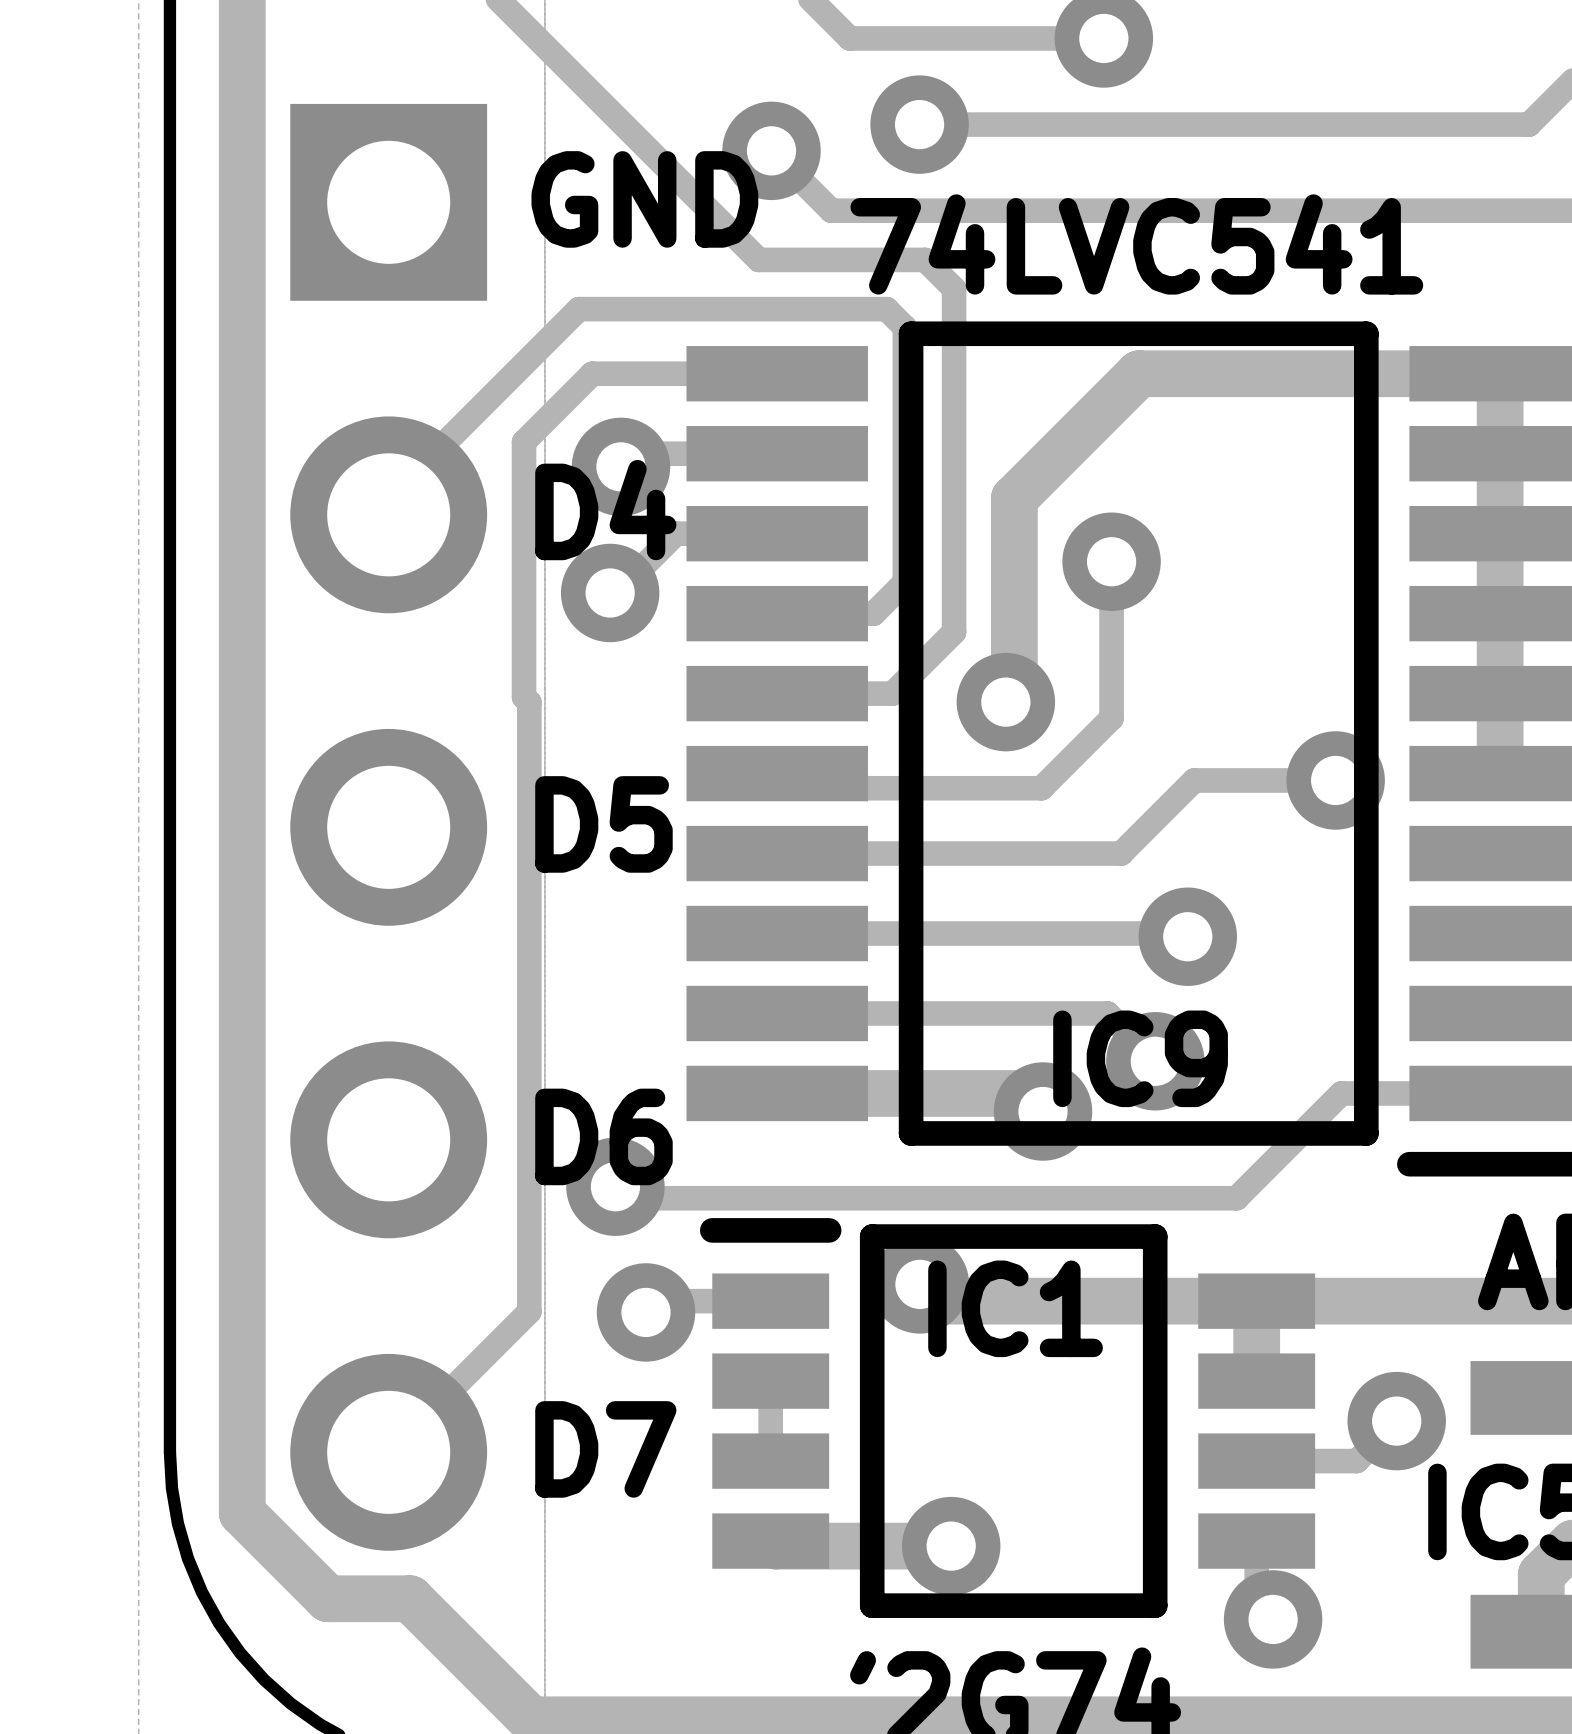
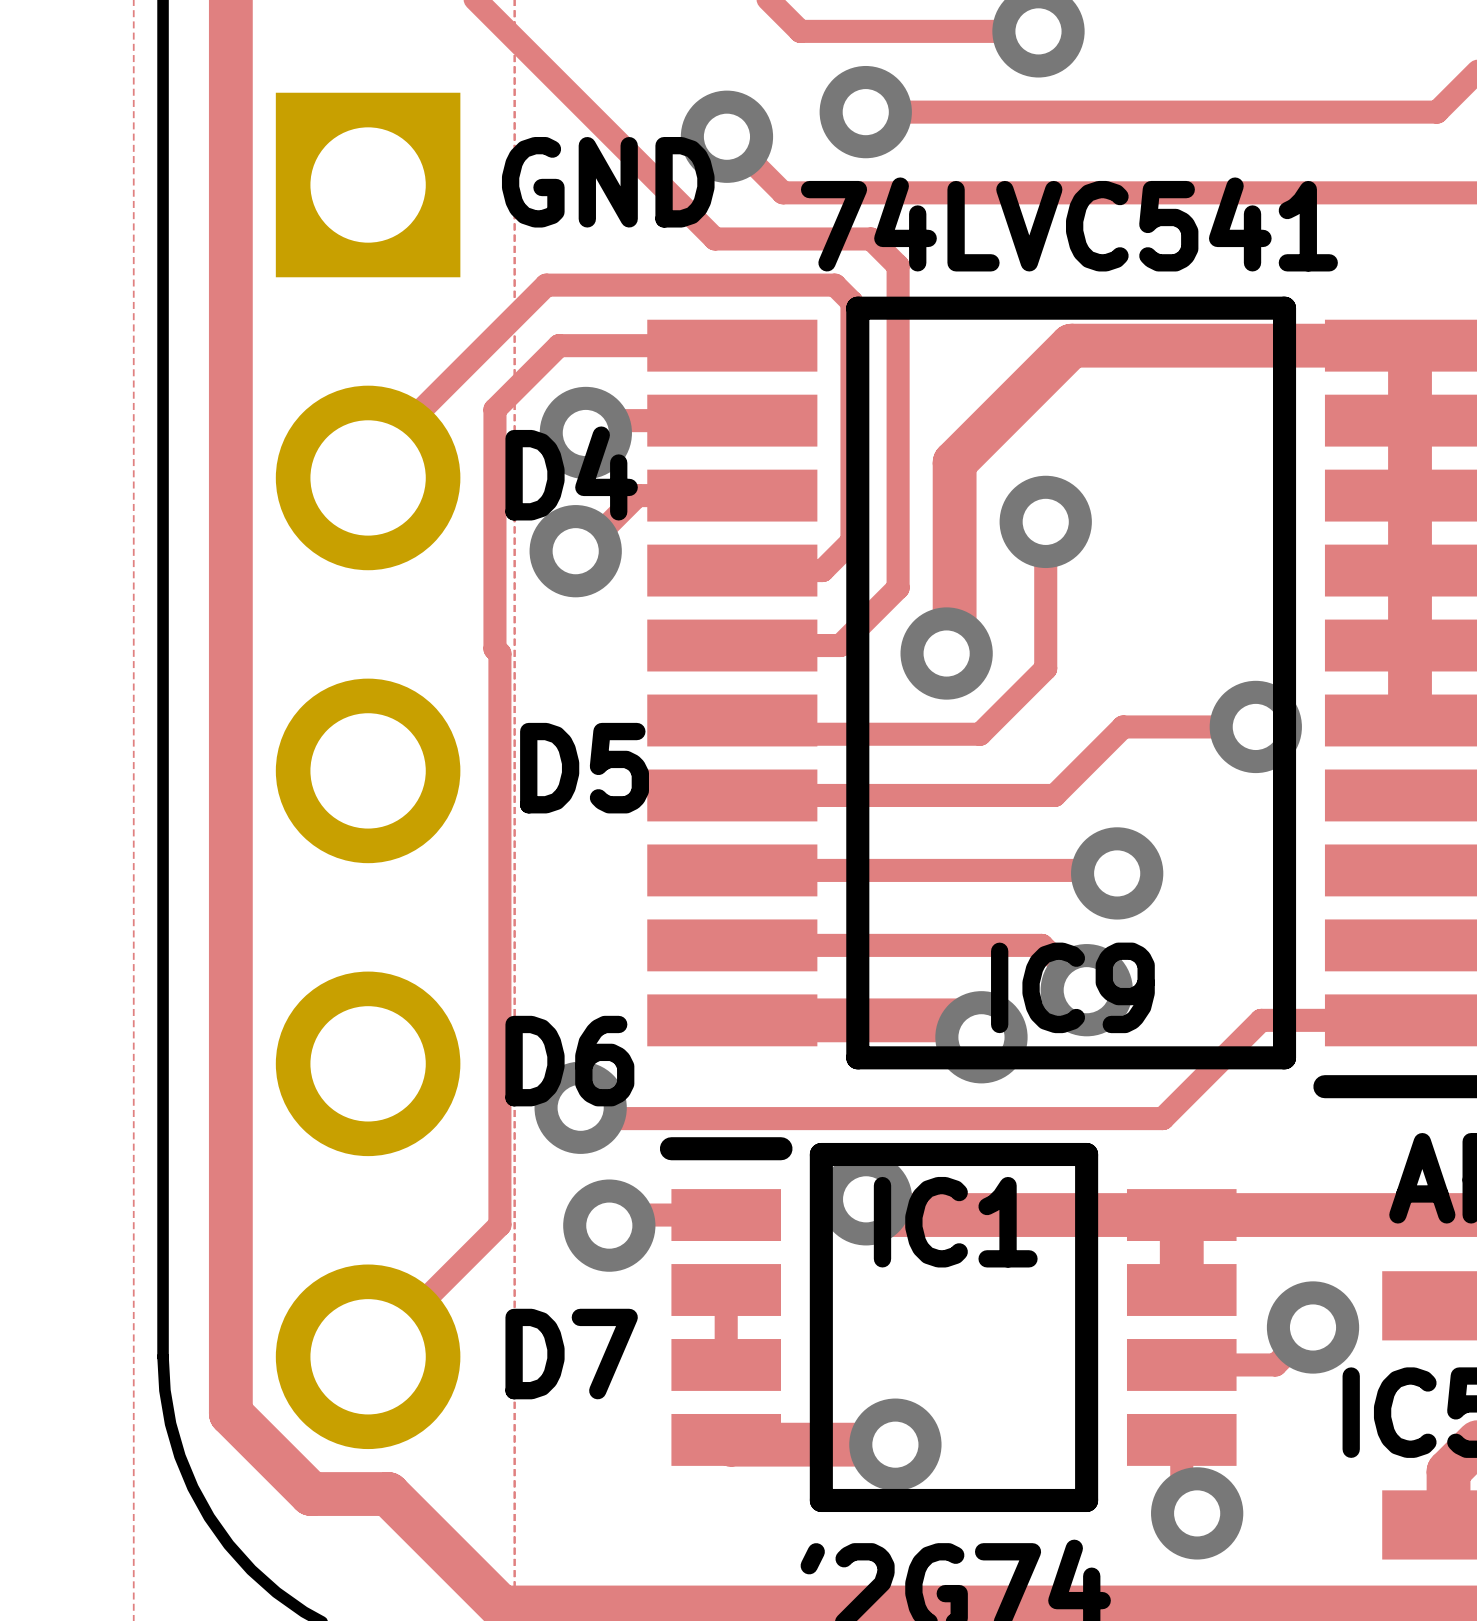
text position: D5 (603, 824) -> D5 (584, 768)

